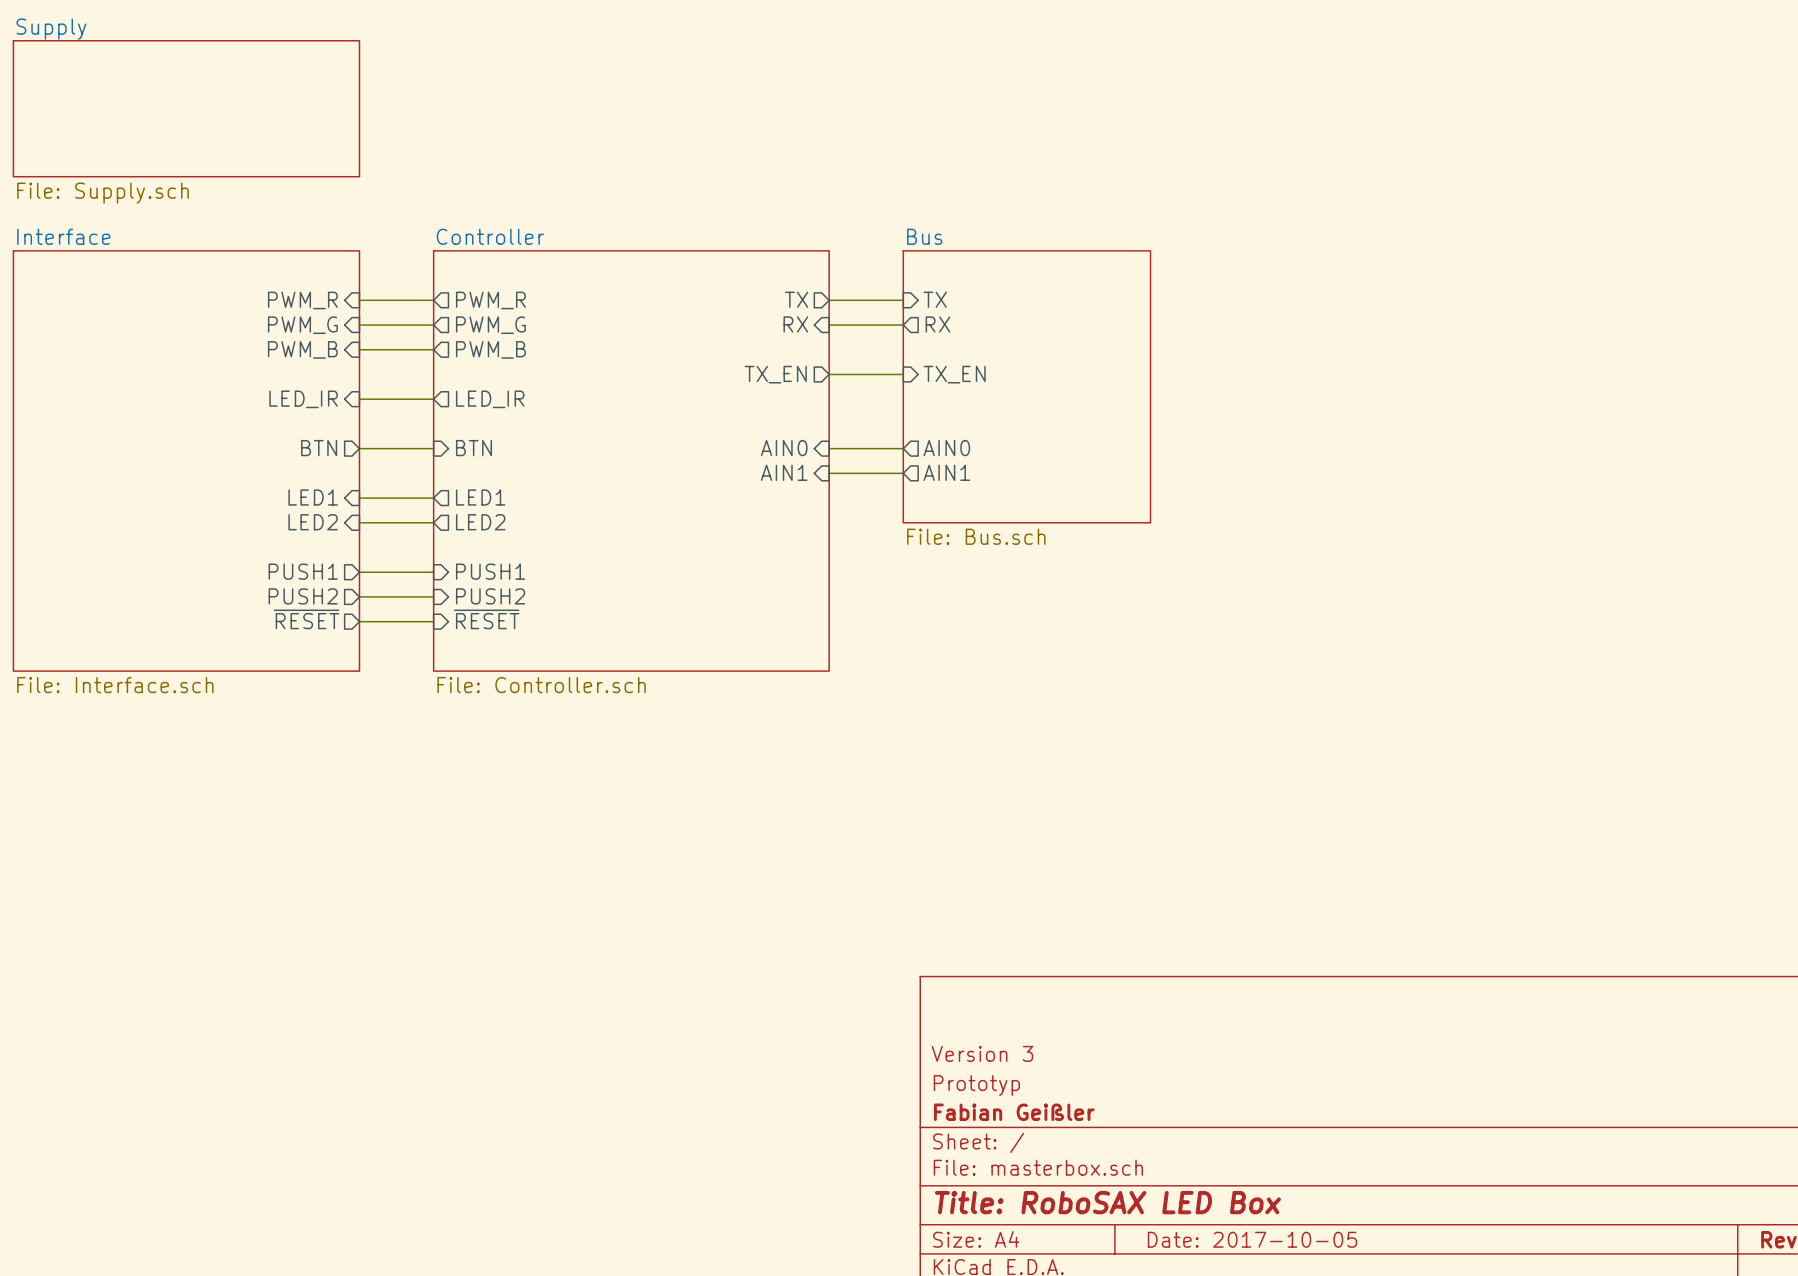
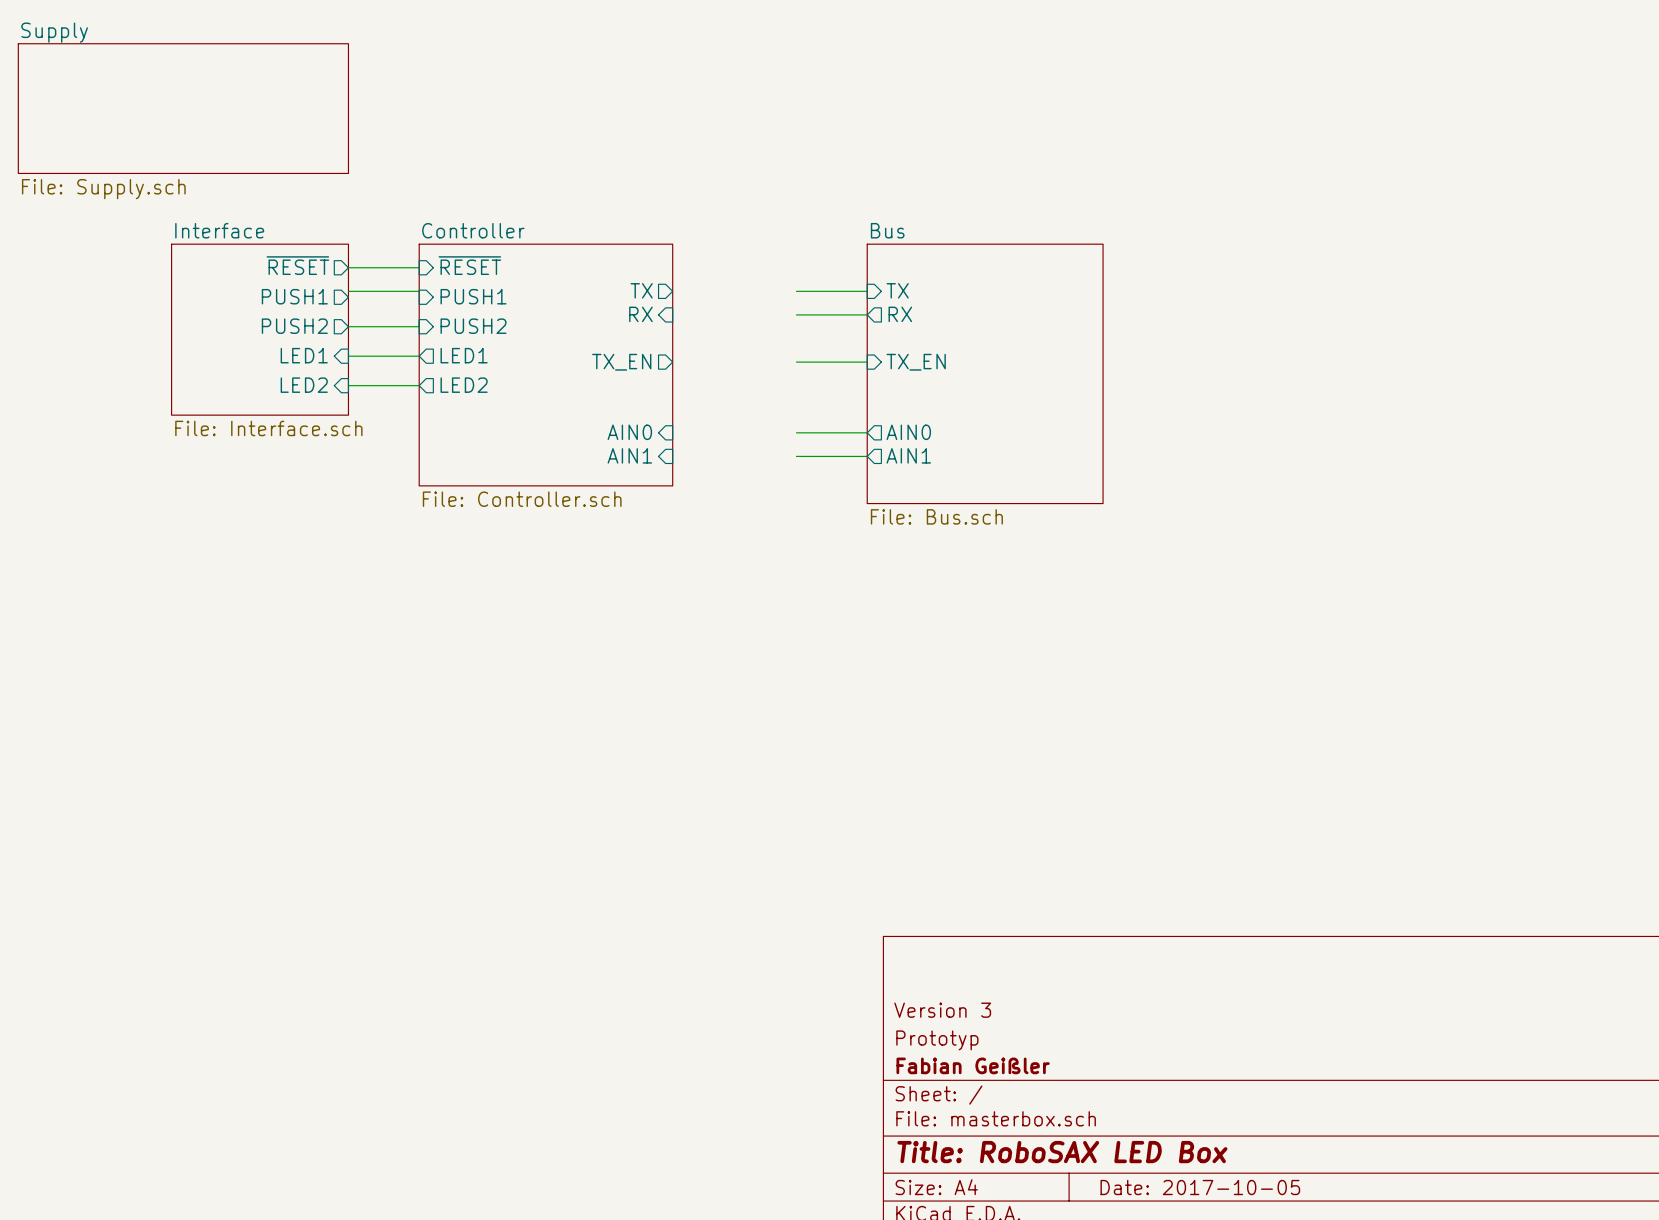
sheet pin: none -> ~{RESET} (297, 265)
sheet pin: none -> ~{RESET} (469, 265)
sheet pin position: TX (796, 299) -> TX (641, 290)
sheet pin shape: input (302, 300) -> output (294, 296)
sheet pin: PWM_R (302, 300) -> PUSH1 (294, 296)
sheet pin shape: output (490, 300) -> input (473, 296)
sheet pin: PWM_R (490, 300) -> PUSH1 (473, 296)
sheet pin position: RX (795, 324) -> RX (640, 314)
sheet pin: PWM_G (302, 325) -> none
wire: (359, 325) (433, 325) -> (348, 267) (419, 267)
sheet pin: PWM_G (490, 325) -> none
wire: none -> (419, 320) (419, 326) (348, 326)
sheet pin: none -> PUSH2 (294, 326)
sheet pin: none -> PUSH2 (473, 326)
sheet Interface: none -> File: Interface.sch (260, 329)
sheet pin: PWM_B (302, 349) -> none
wire: (359, 349) (433, 349) -> (348, 356) (419, 356)
sheet pin: PWM_B (490, 349) -> none
sheet pin: none -> LED1 (304, 355)
sheet pin: none -> LED1 (464, 355)
sheet pin position: TX_EN (775, 374) -> TX_EN (621, 362)
sheet Controller: none -> File: Controller.sch (545, 365)
sheet pin: LED_IR (303, 399) -> LED2 (304, 385)
sheet pin: LED_IR (490, 399) -> LED2 (464, 385)
sheet pin: BTN (319, 448) -> none
wire: (359, 448) (433, 448) -> none
sheet pin: BTN (473, 448) -> none
sheet pin position: AIN0 (784, 448) -> AIN0 (629, 432)
sheet Interface: File: Interface.sch (186, 460) -> none
sheet Controller: File: Controller.sch (631, 460) -> none
sheet pin position: AIN1 (784, 472) -> AIN1 (629, 455)
sheet pin: LED1 (313, 497) -> none
sheet pin: LED1 (480, 497) -> none
wire: (359, 498) (433, 498) -> none
sheet pin: LED2 (313, 522) -> none
wire: (359, 522) (433, 522) -> none
sheet pin: LED2 (480, 522) -> none
sheet pin: PUSH1 (303, 571) -> none
sheet pin: PUSH1 (490, 571) -> none
wire: (359, 572) (433, 572) -> none
sheet pin: PUSH2 (303, 596) -> none
wire: (359, 596) (433, 596) -> none
sheet pin: PUSH2 (490, 596) -> none
sheet pin: ~{RESET} (306, 619) -> none
sheet pin: ~{RESET} (486, 619) -> none
wire: (359, 621) (433, 621) -> none

